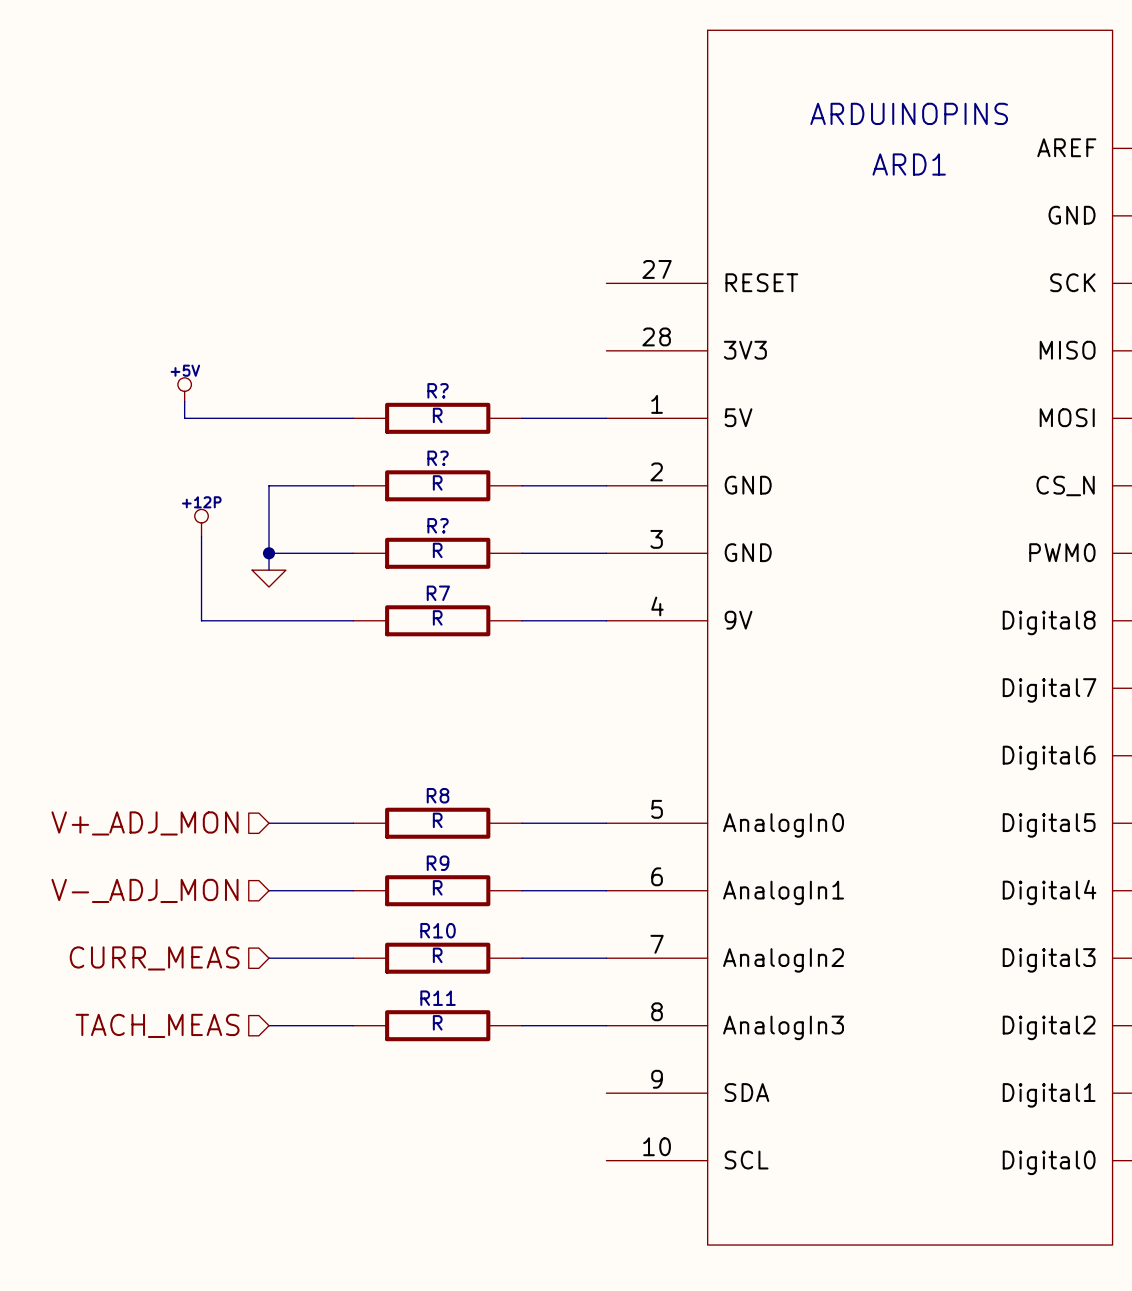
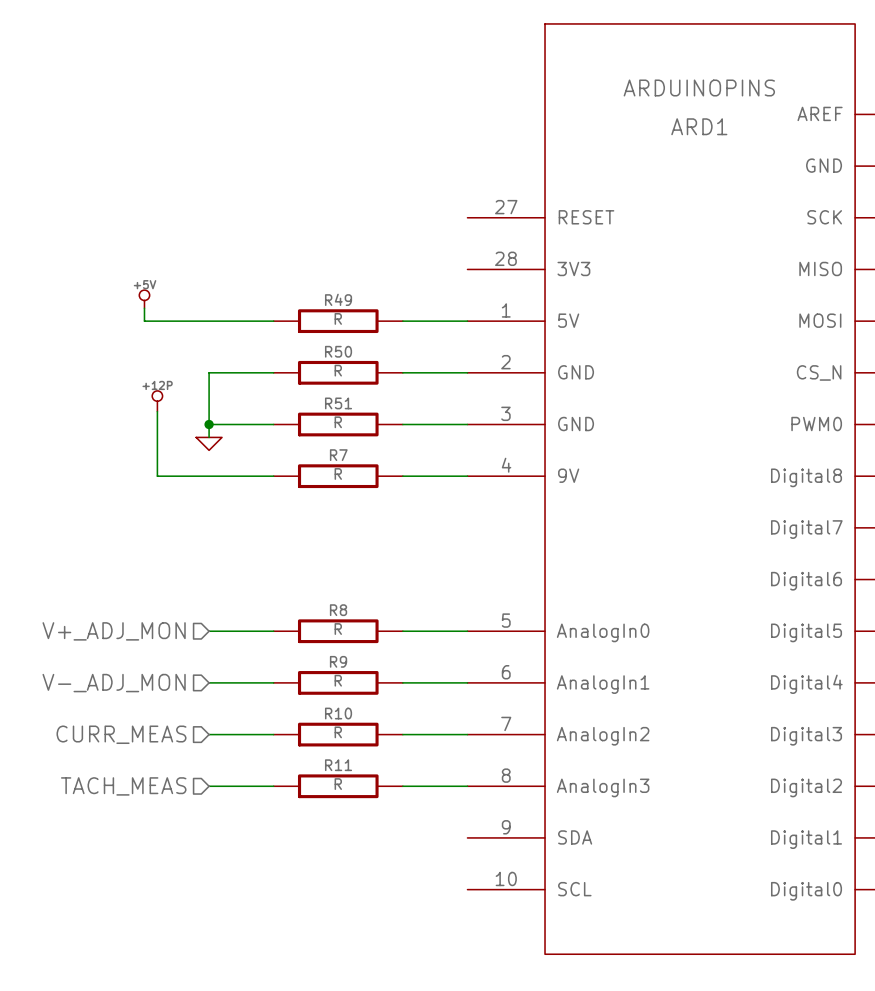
R? name: R? (438, 390) -> R49 (338, 299)
R? name: R? (438, 458) -> R50 (338, 351)
R? name: R? (438, 525) -> R51 (338, 403)

